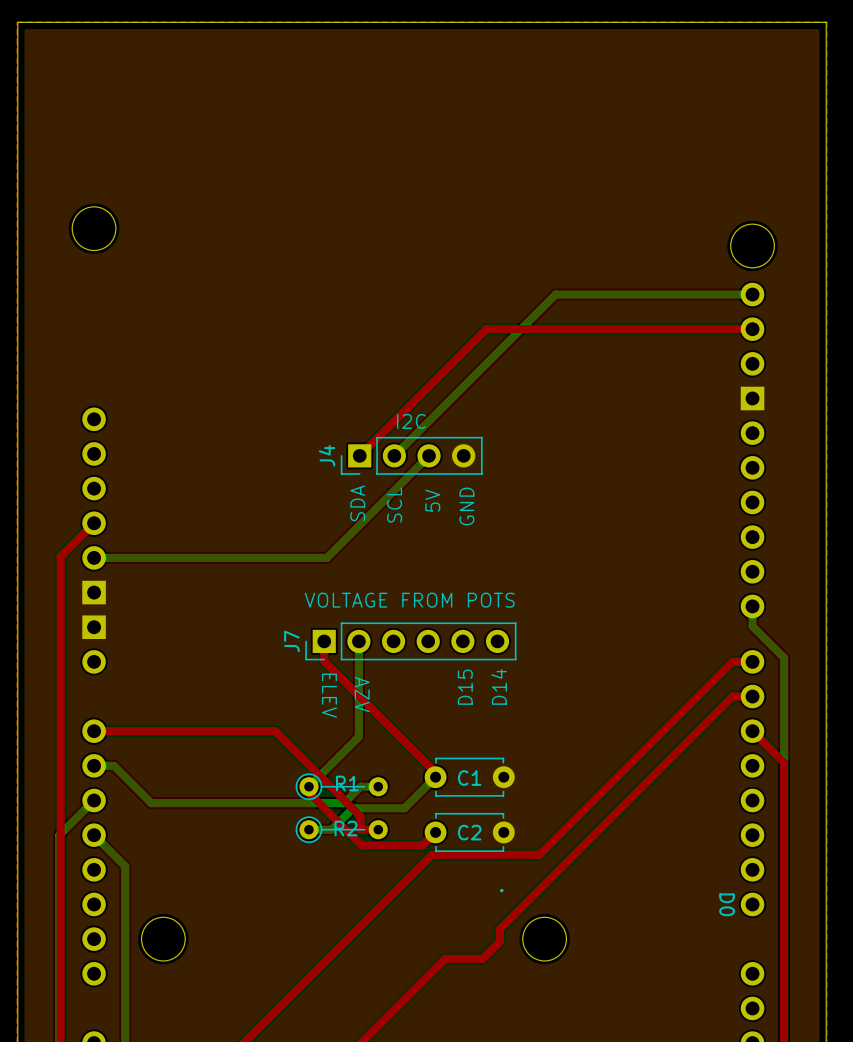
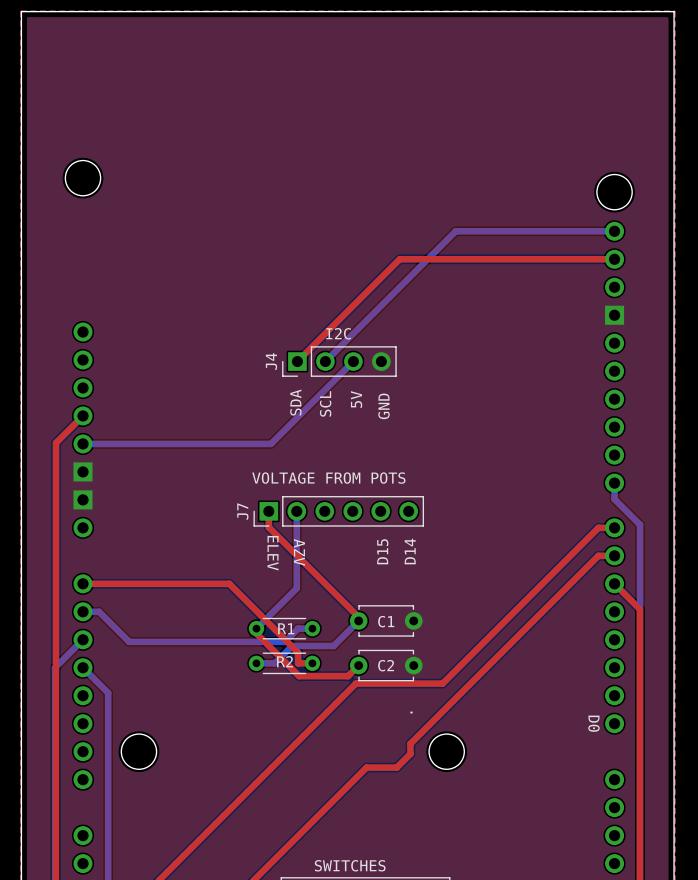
R1 footprint: [295, 773, 388, 801] -> [248, 617, 321, 640]
R2 footprint: [295, 816, 388, 844] -> [248, 652, 321, 675]

